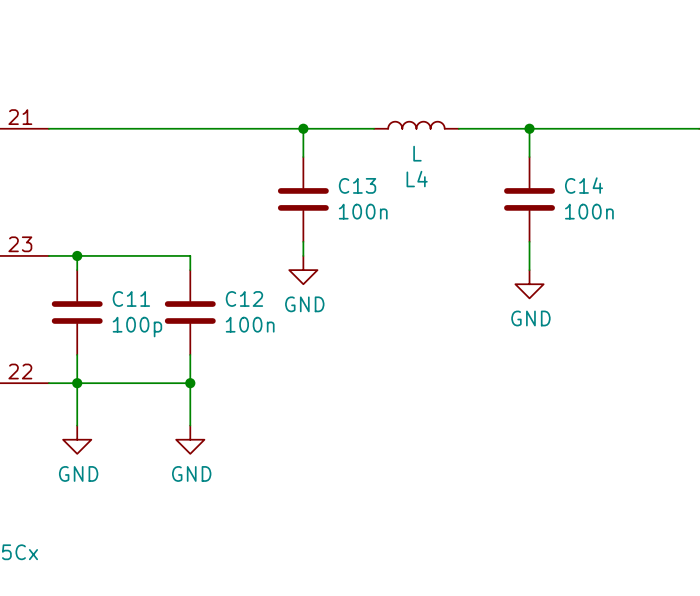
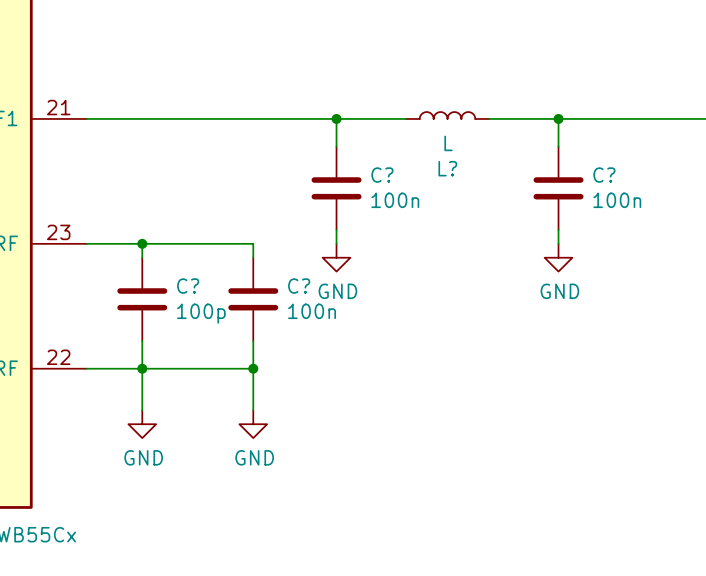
L4 name: L4 (417, 179) -> L? (447, 168)
C13 name: C13 (357, 185) -> C? (382, 175)
C14 name: C14 (584, 185) -> C? (604, 175)
wire: (77, 255) (77, 270) -> (142, 243) (142, 257)
junction position: (77, 255) -> (142, 243)
wire: (190, 255) (190, 270) -> (225, 243) (253, 243) (253, 257)
power symbol position: GND (529, 284) -> GND (558, 257)
C11: 100p (77, 312) -> none
C?: none -> 100p (142, 299)
C12: 100n (190, 312) -> none
C?: none -> 100n (253, 299)
wire: (77, 354) (77, 425) -> (142, 340) (142, 410)
wire: (190, 354) (190, 425) -> (253, 340) (253, 410)
junction position: (77, 383) -> (142, 368)
wire: none -> (225, 368) (253, 368)
junction position: (190, 383) -> (253, 368)
power symbol position: GND (77, 439) -> GND (142, 424)
power symbol position: GND (190, 439) -> GND (253, 424)

